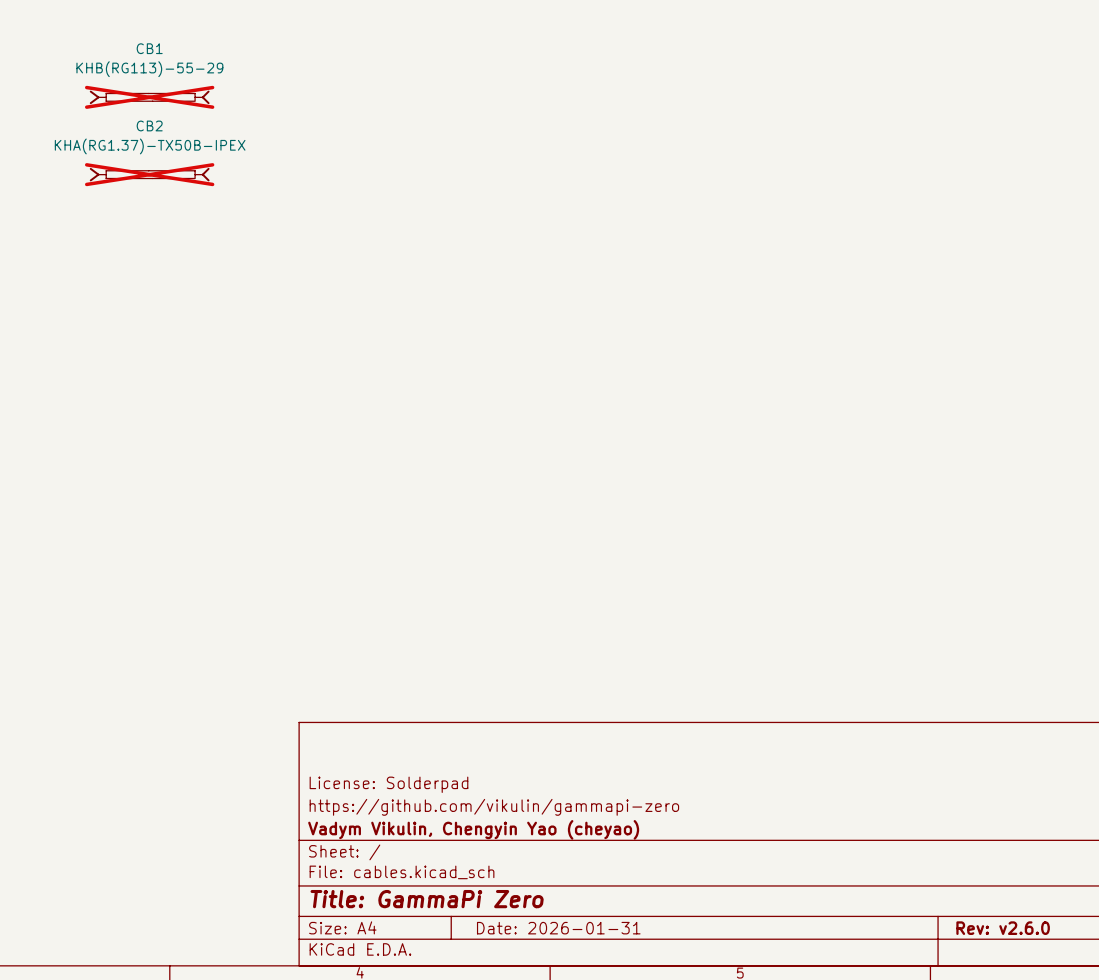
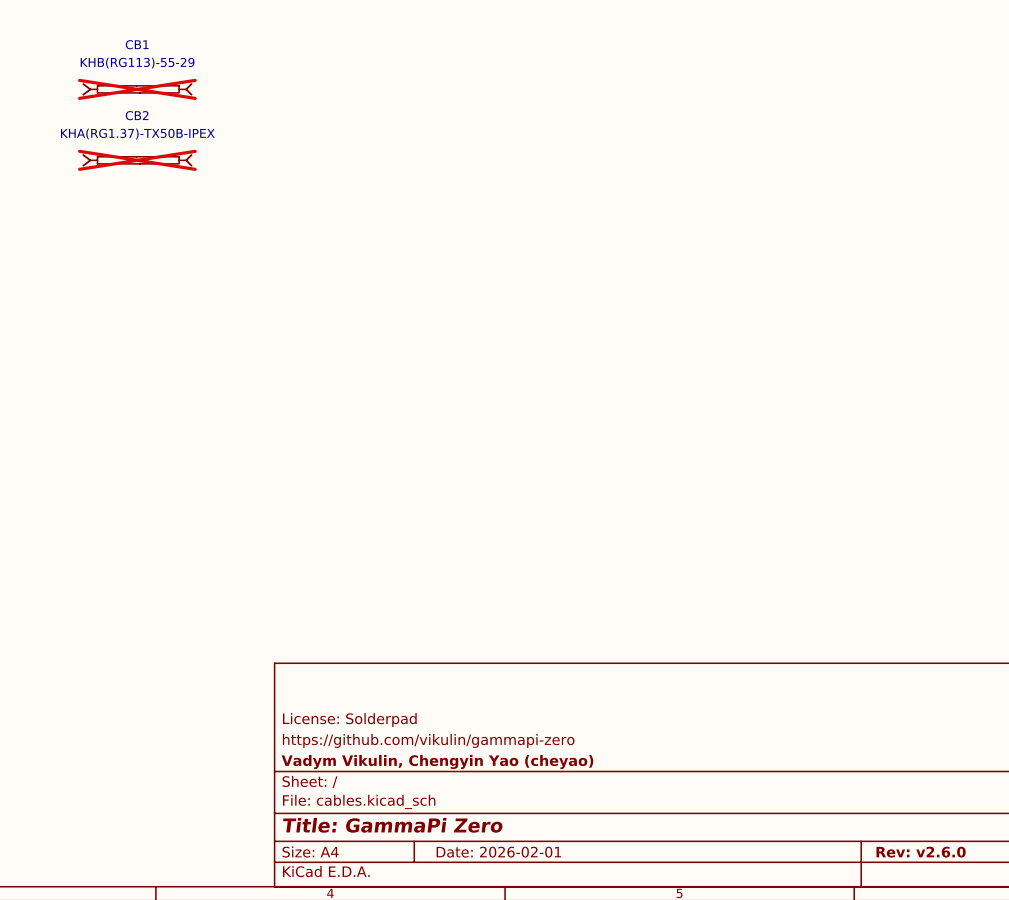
title block: Date: 2026-01-31 (558, 928) -> Date: 2026-02-01 (498, 852)

